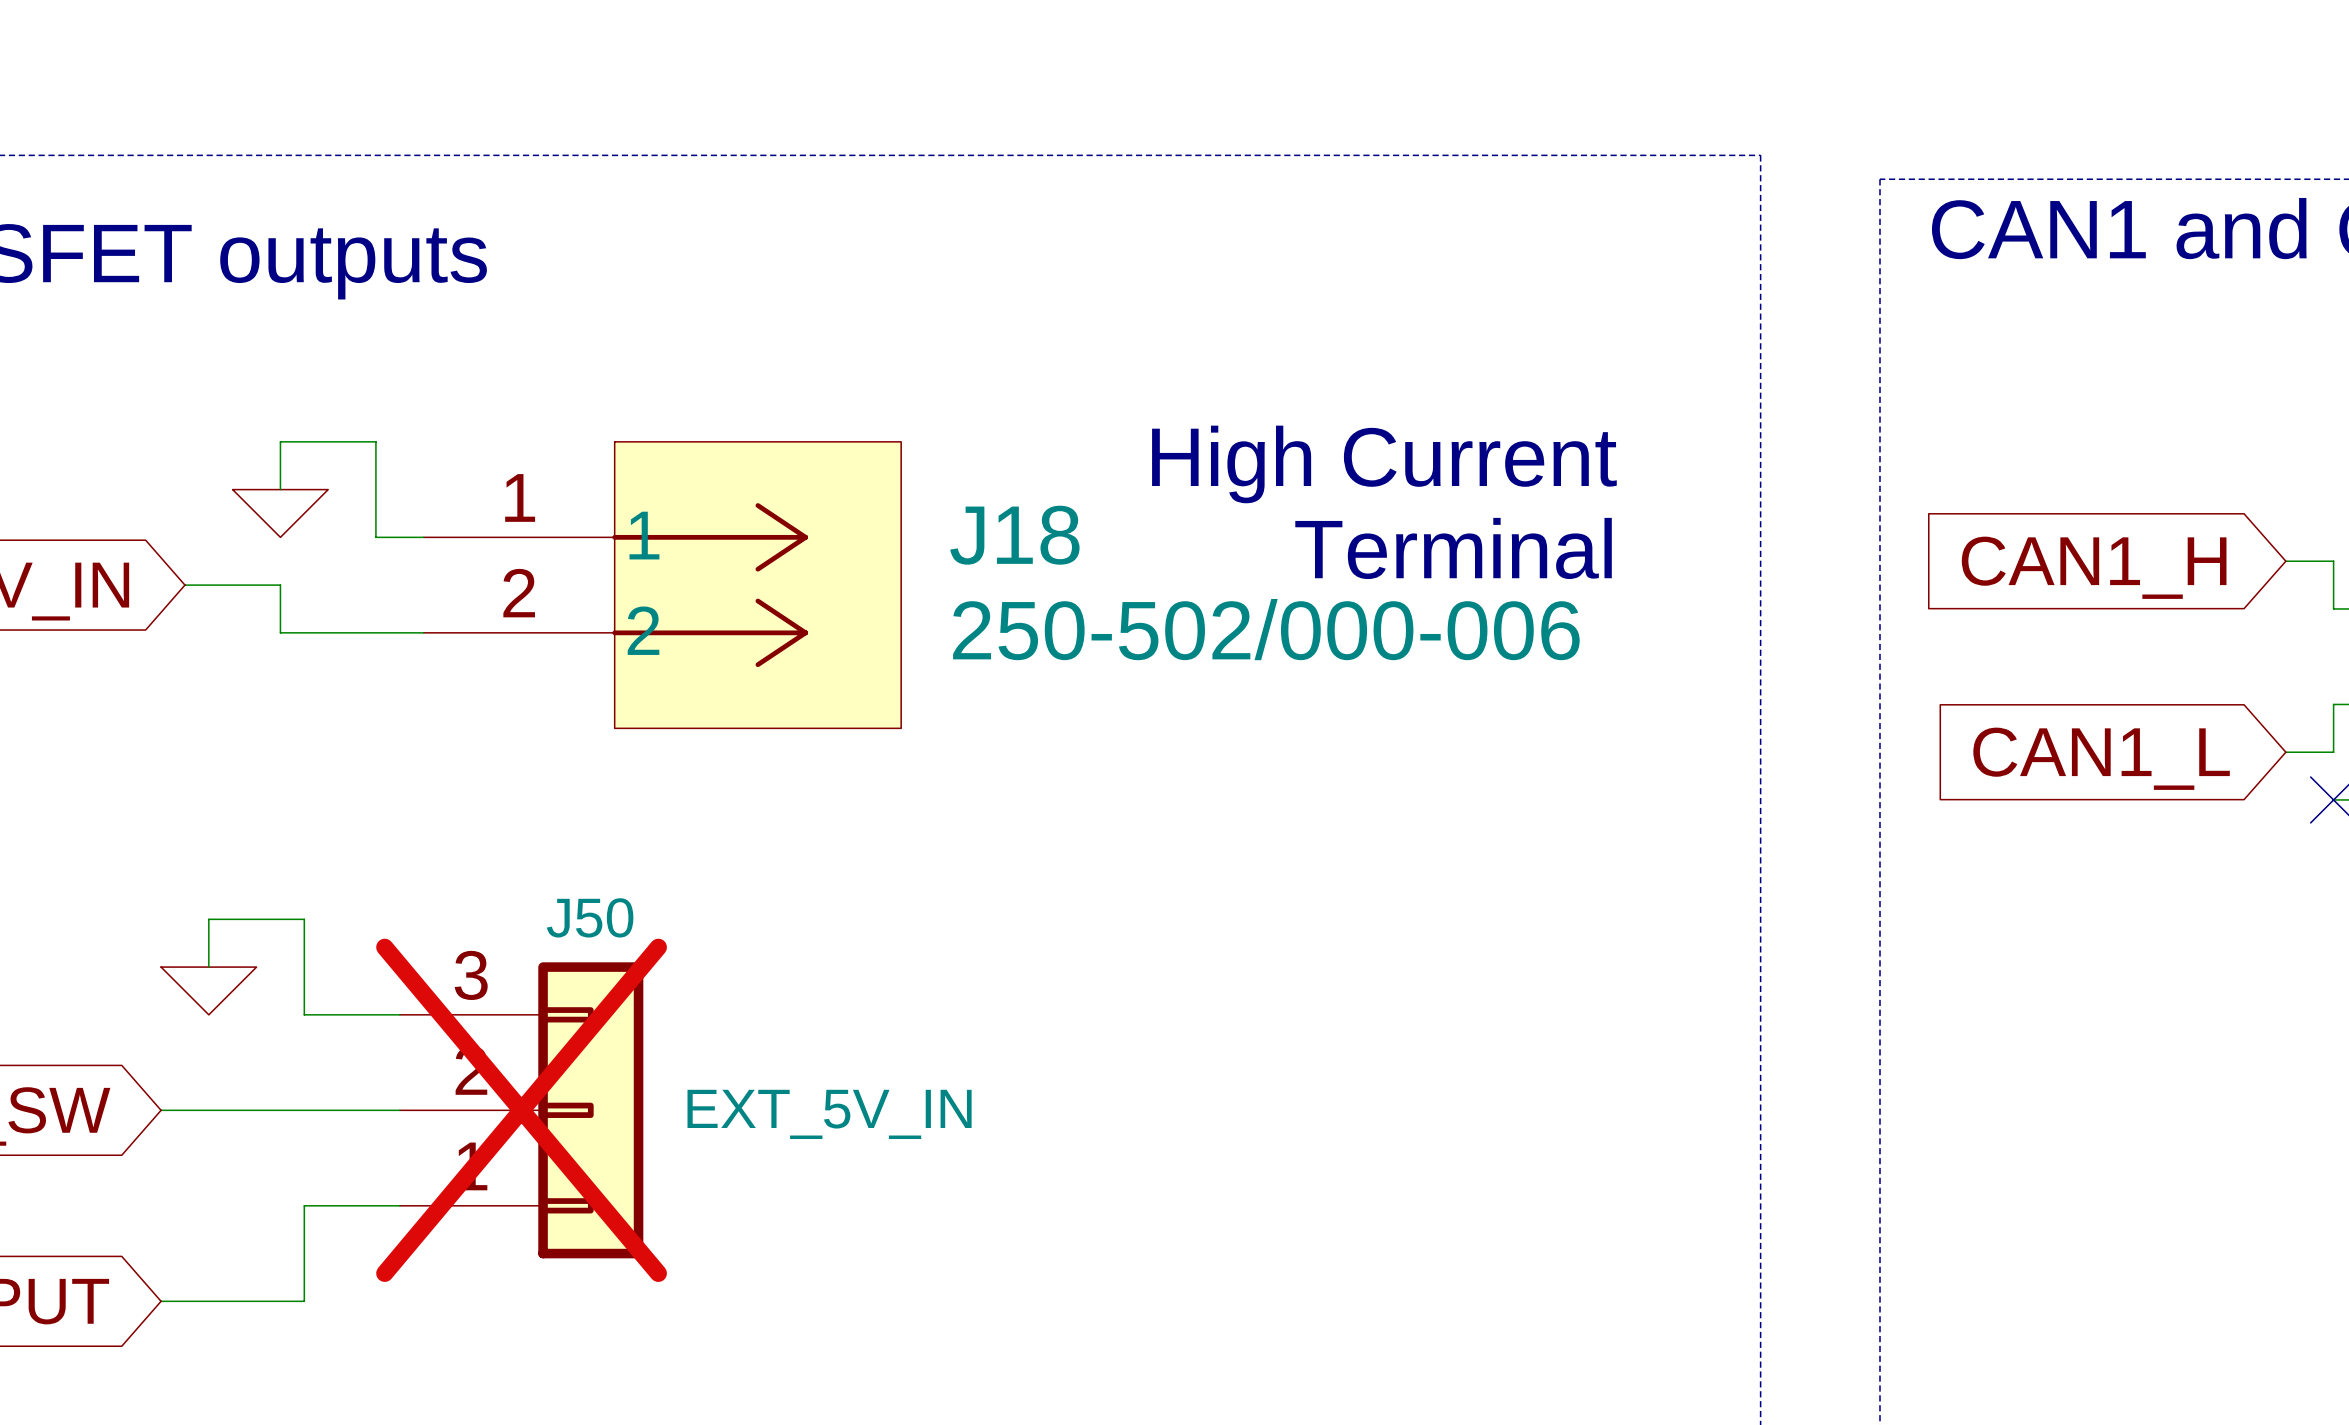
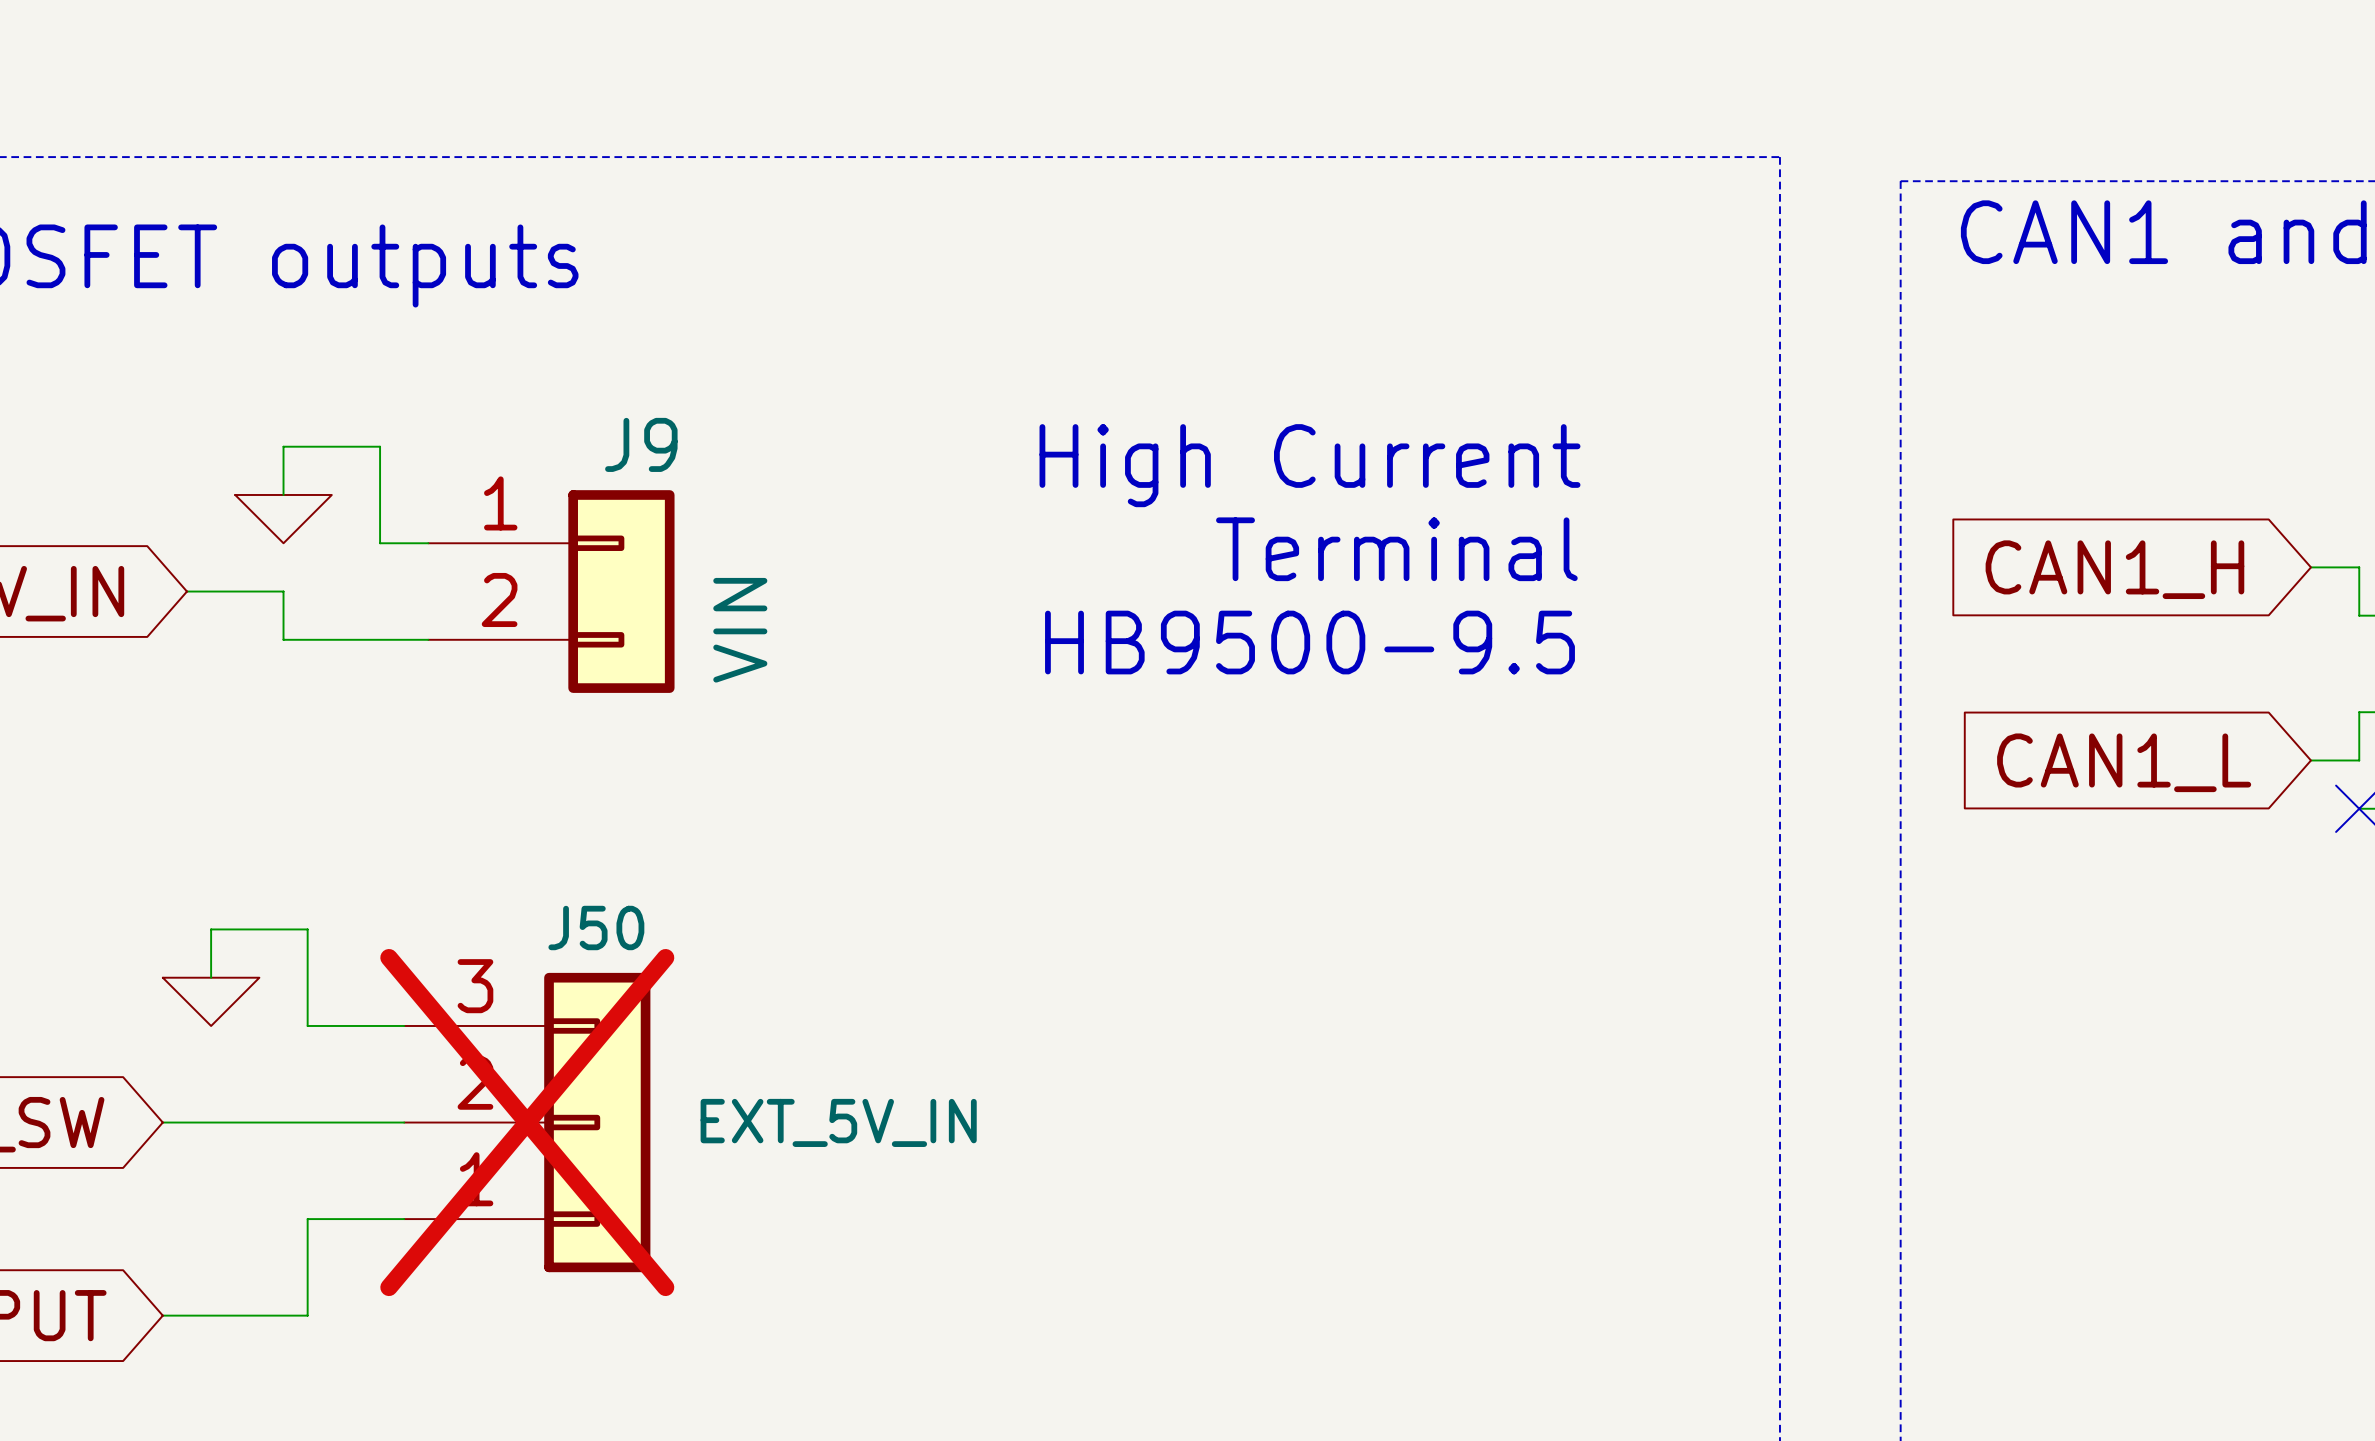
text position: High Current (1384, 464) -> High Current (1309, 465)
text position: Terminal (1453, 548) -> Terminal (1396, 549)
J9: none -> VIN (551, 591)
J18: 250-502/000-006 (662, 585) -> none
text: none -> HB9500-9.5 (1309, 642)

